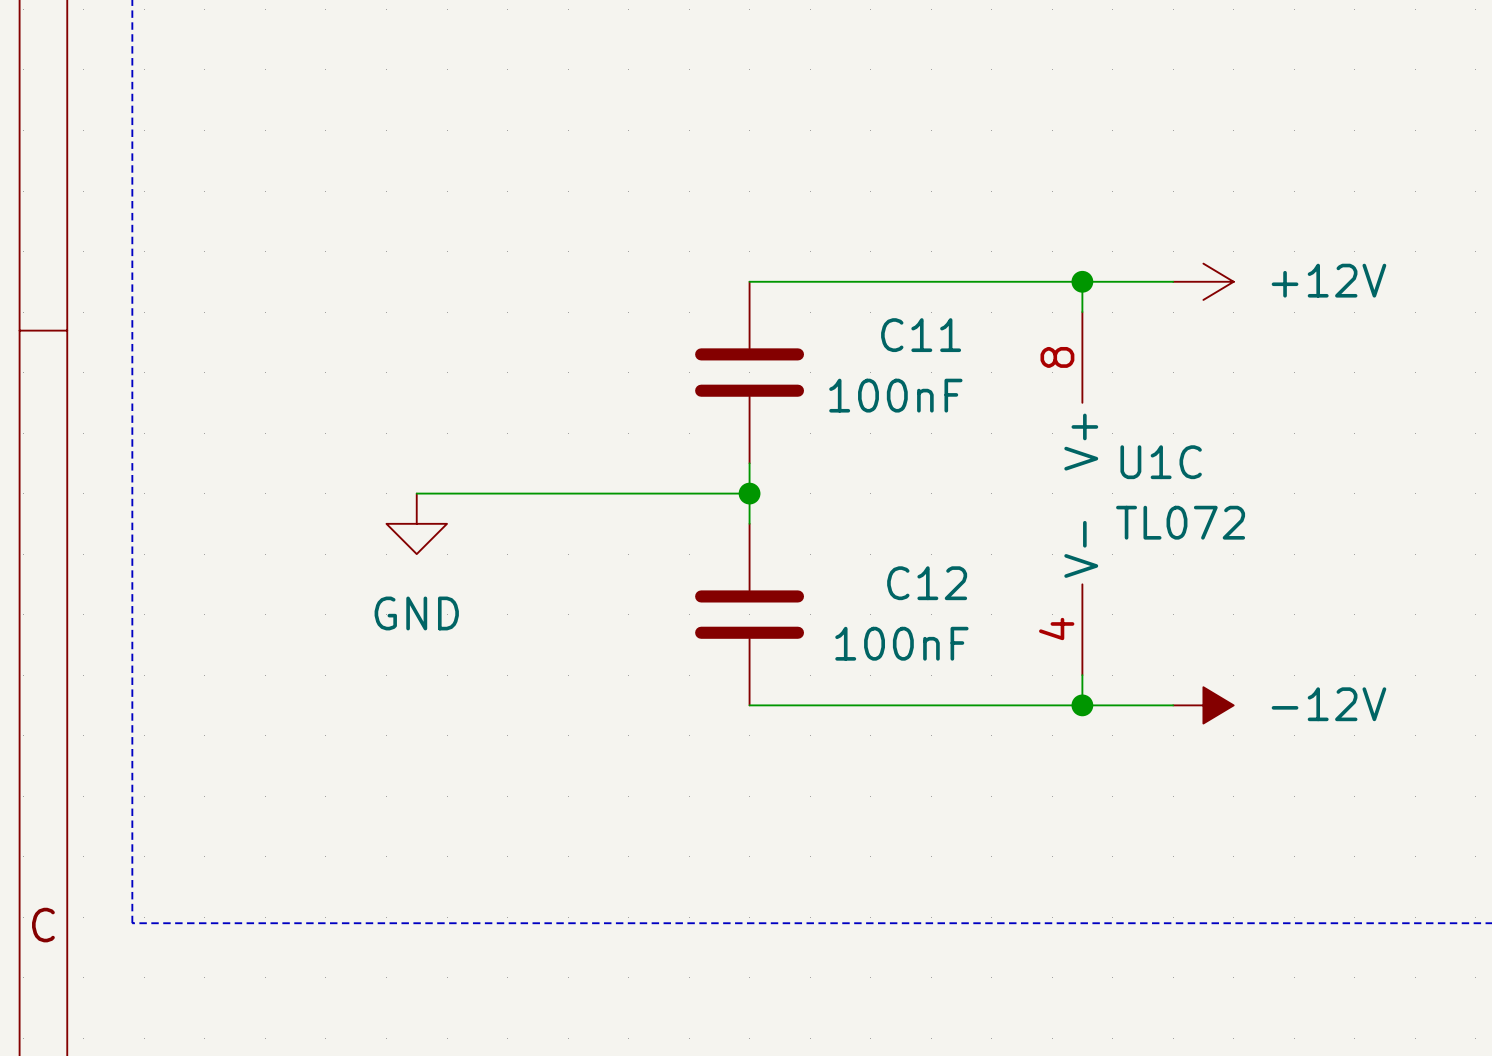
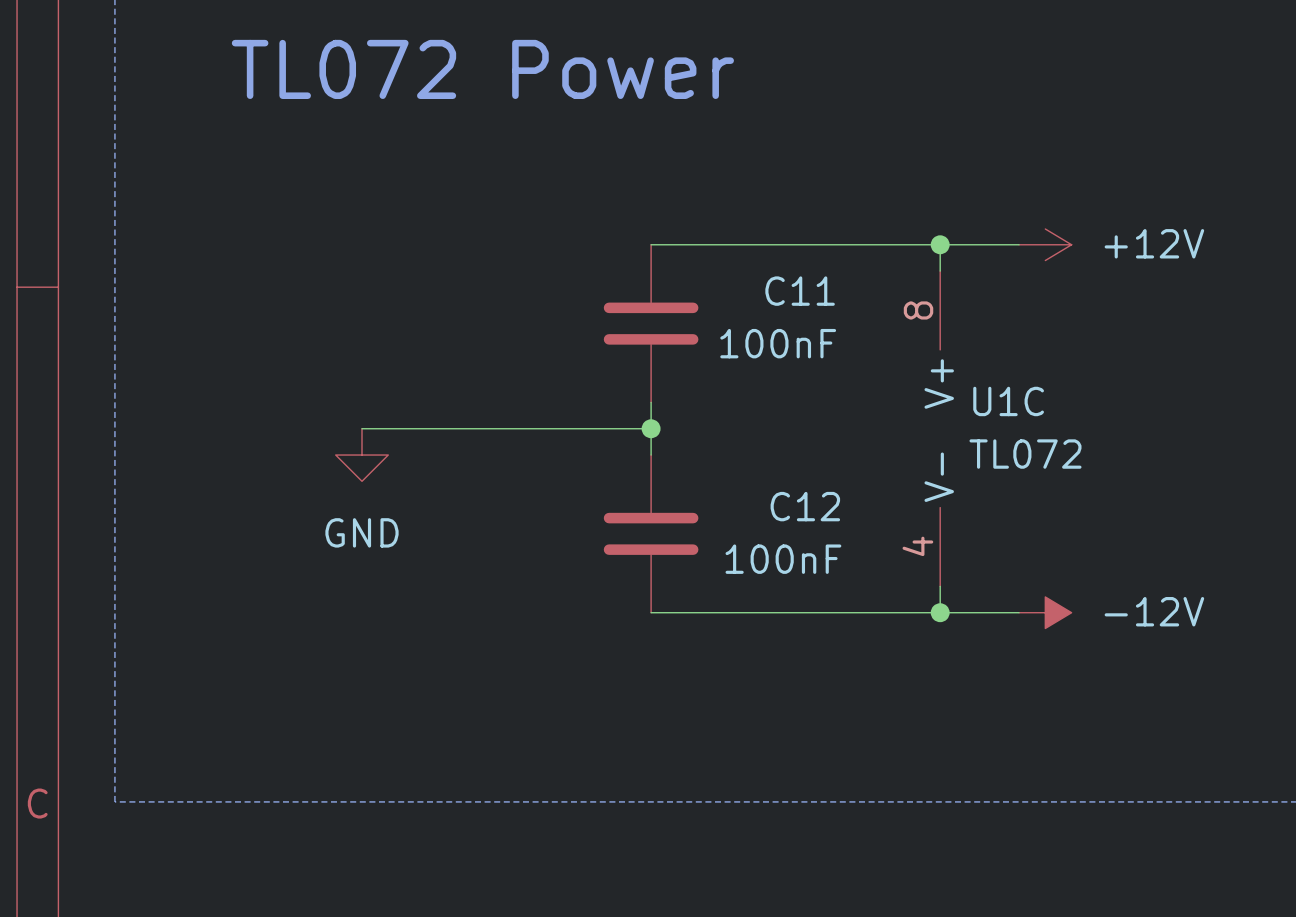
text: none -> TL072 Power (482, 69)

